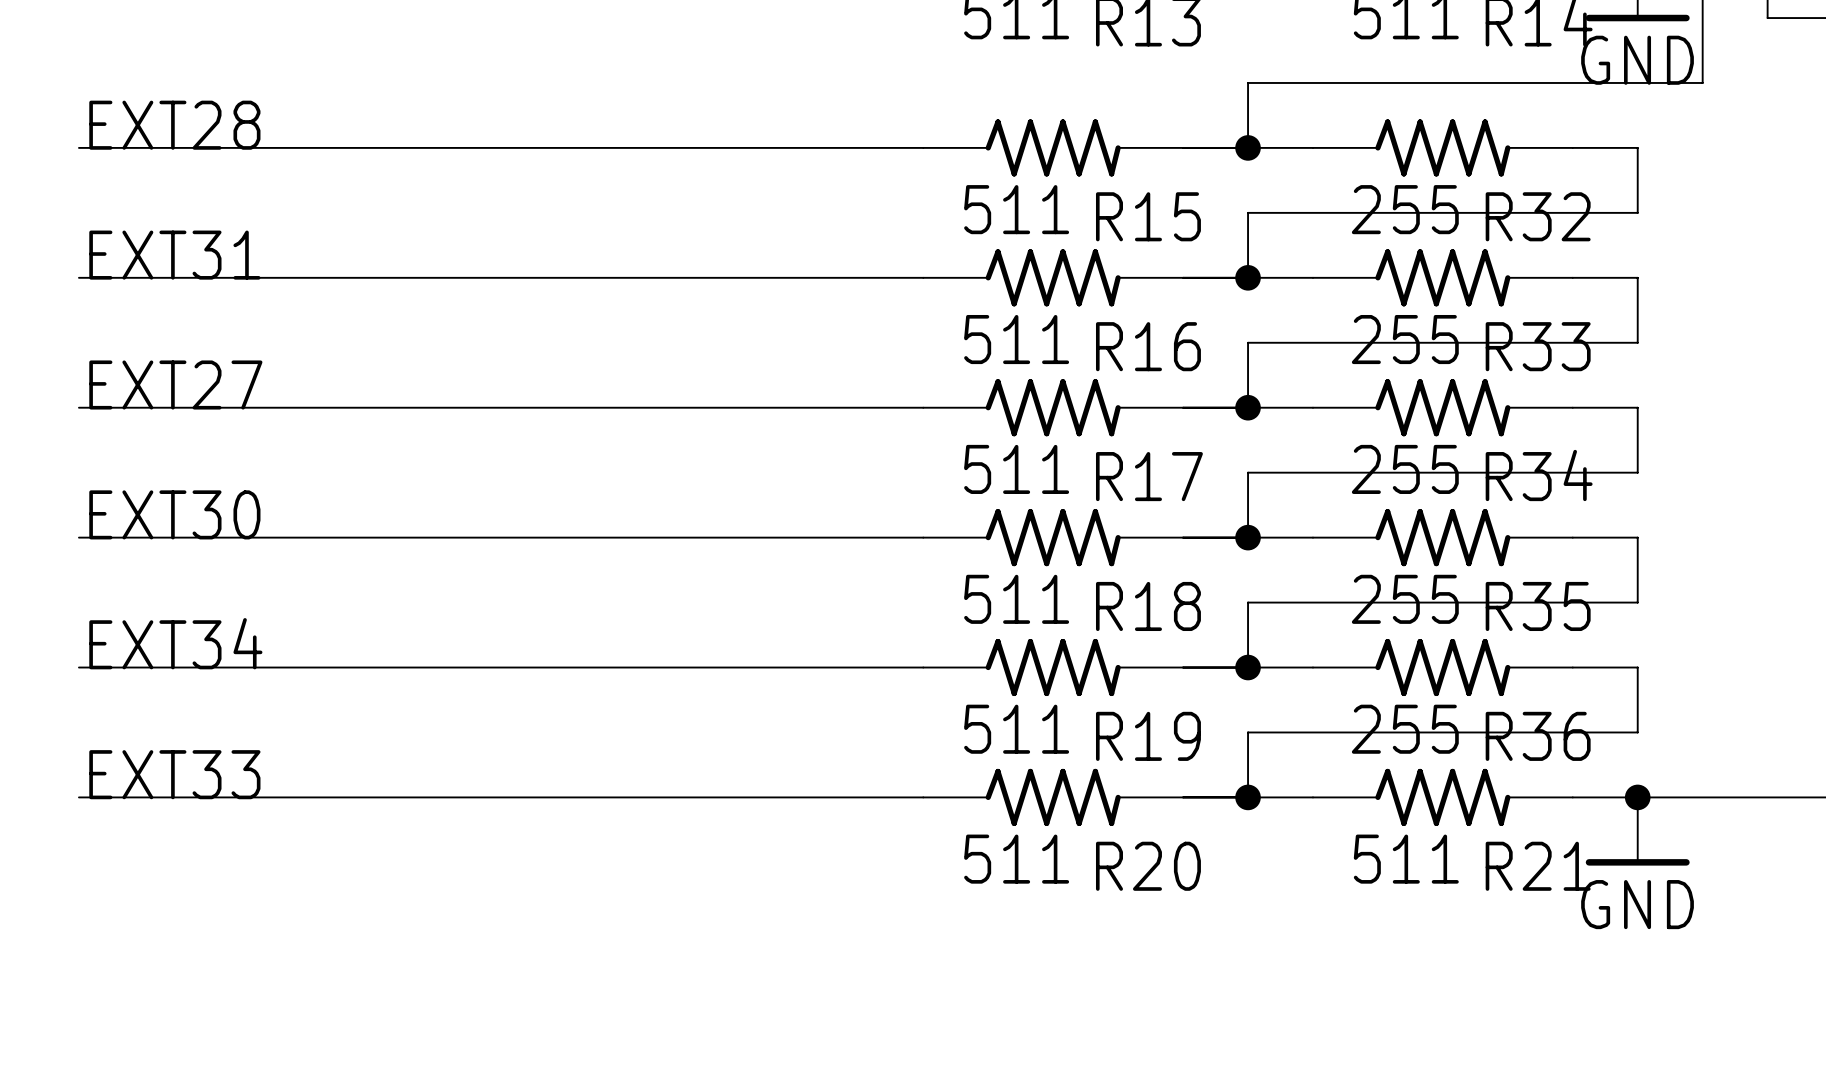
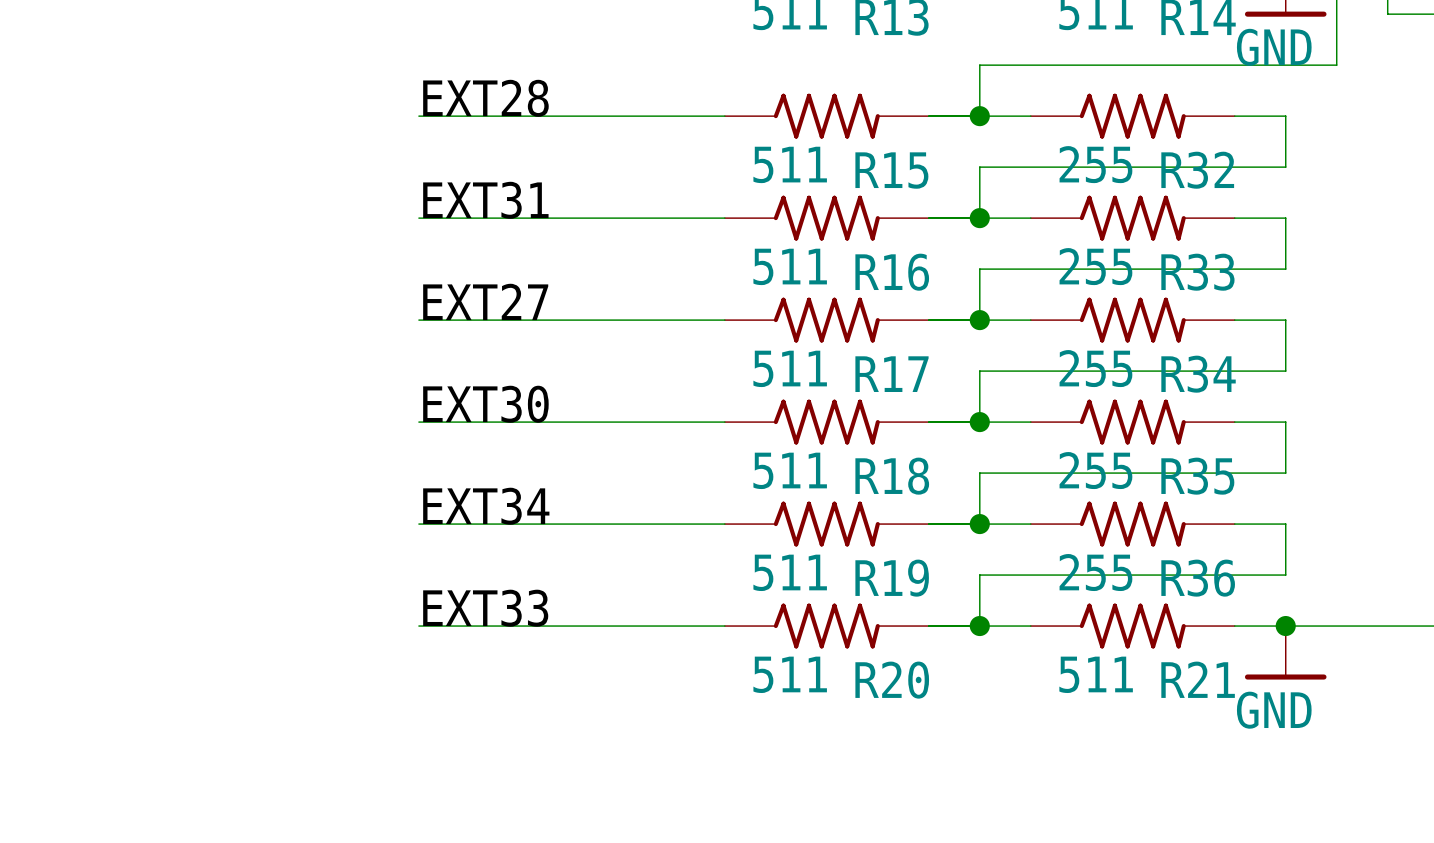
label position: EXT28 (174, 125) -> EXT28 (485, 98)
wire: (78, 147) (533, 147) -> none
label position: EXT31 (174, 255) -> EXT31 (485, 200)
wire: (78, 277) (533, 277) -> none
label position: EXT27 (175, 384) -> EXT27 (485, 301)
wire: (78, 407) (533, 407) -> none
label position: EXT30 (174, 514) -> EXT30 (485, 404)
wire: (78, 537) (533, 537) -> none
label position: EXT34 (175, 643) -> EXT34 (486, 506)
wire: (78, 667) (533, 667) -> none
label position: EXT33 (174, 774) -> EXT33 (485, 608)
wire: (78, 797) (533, 797) -> none

